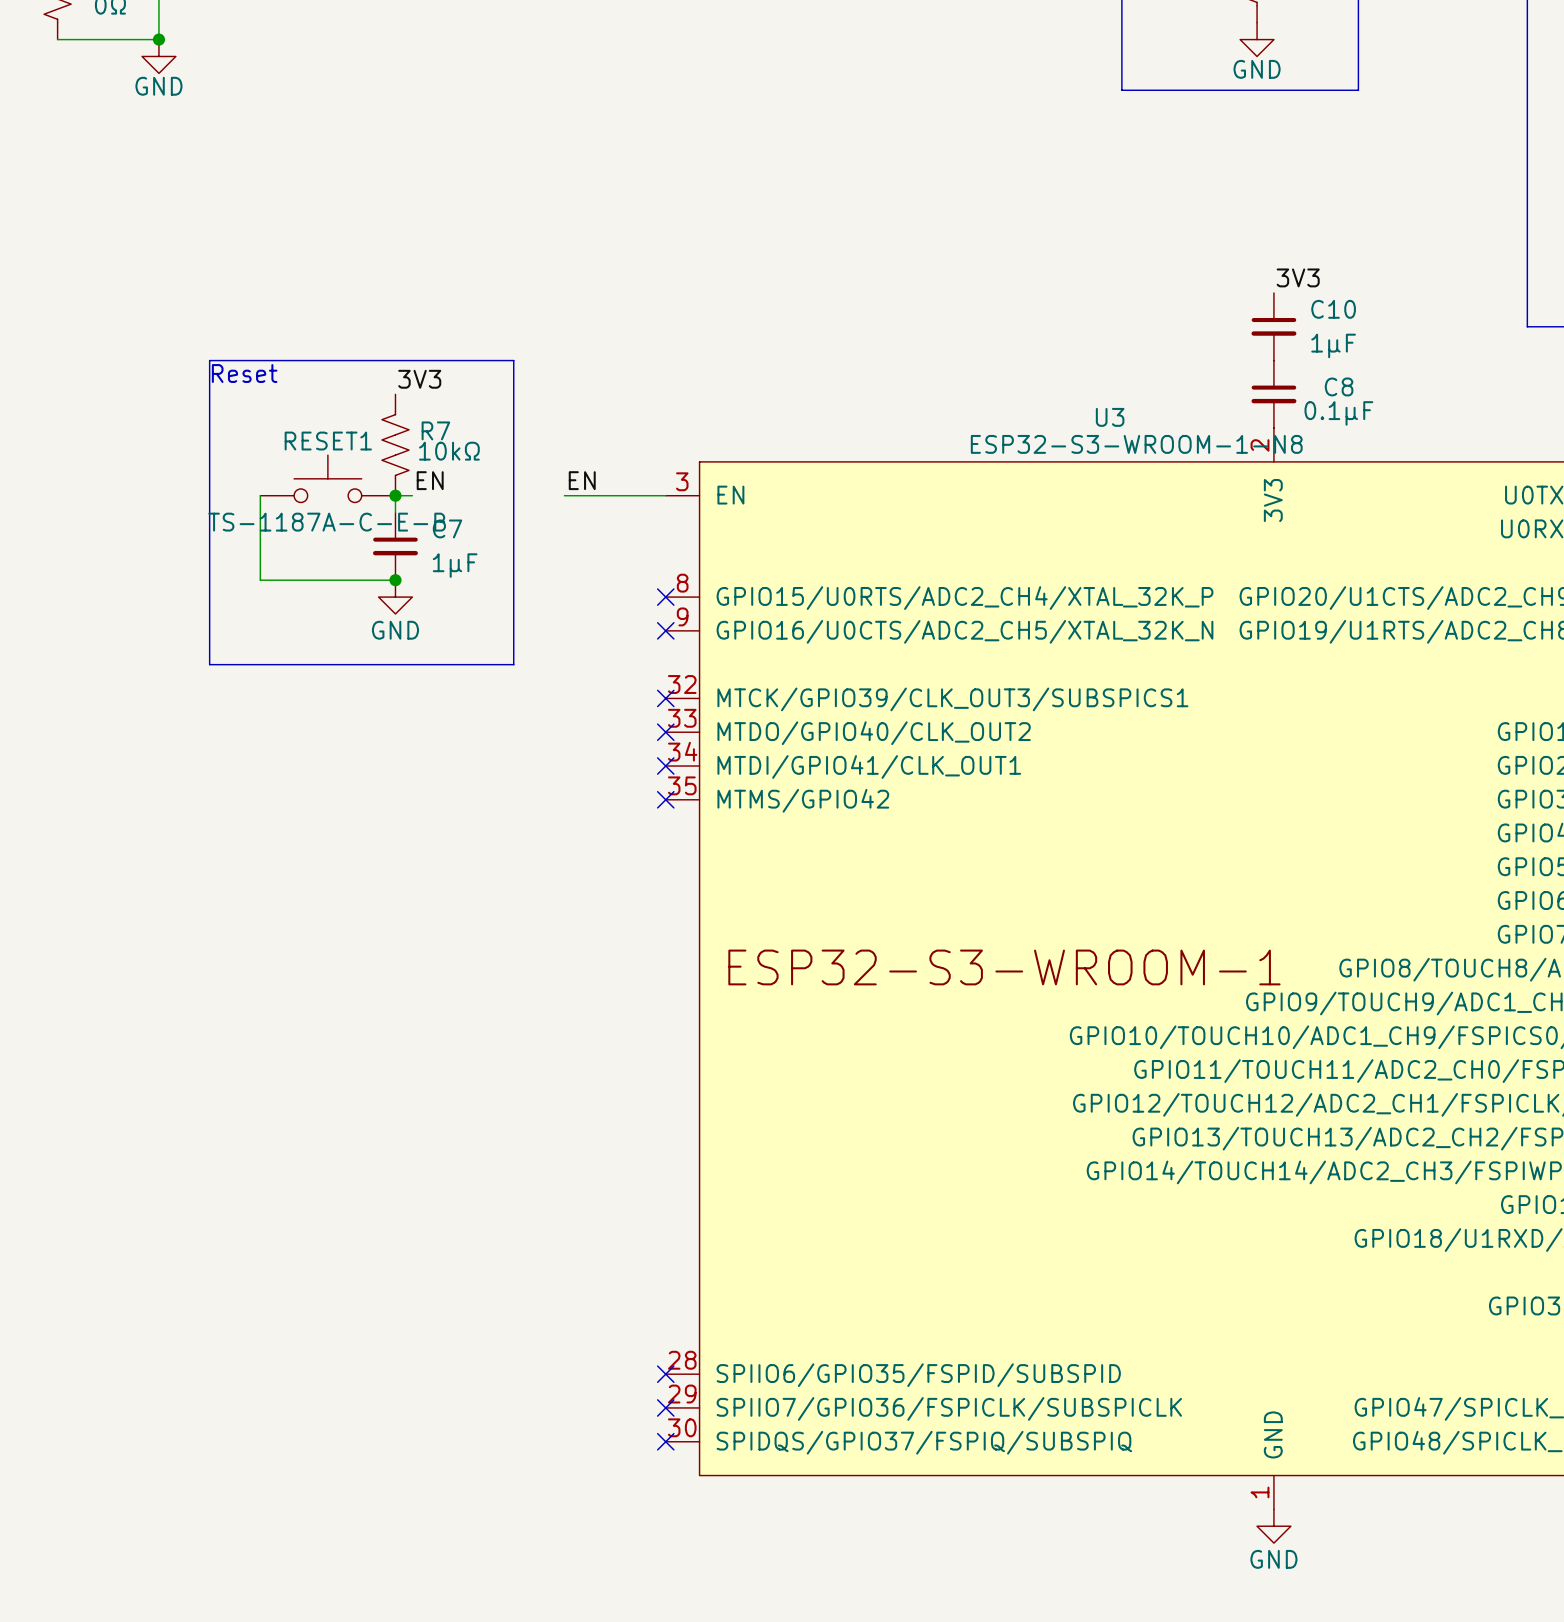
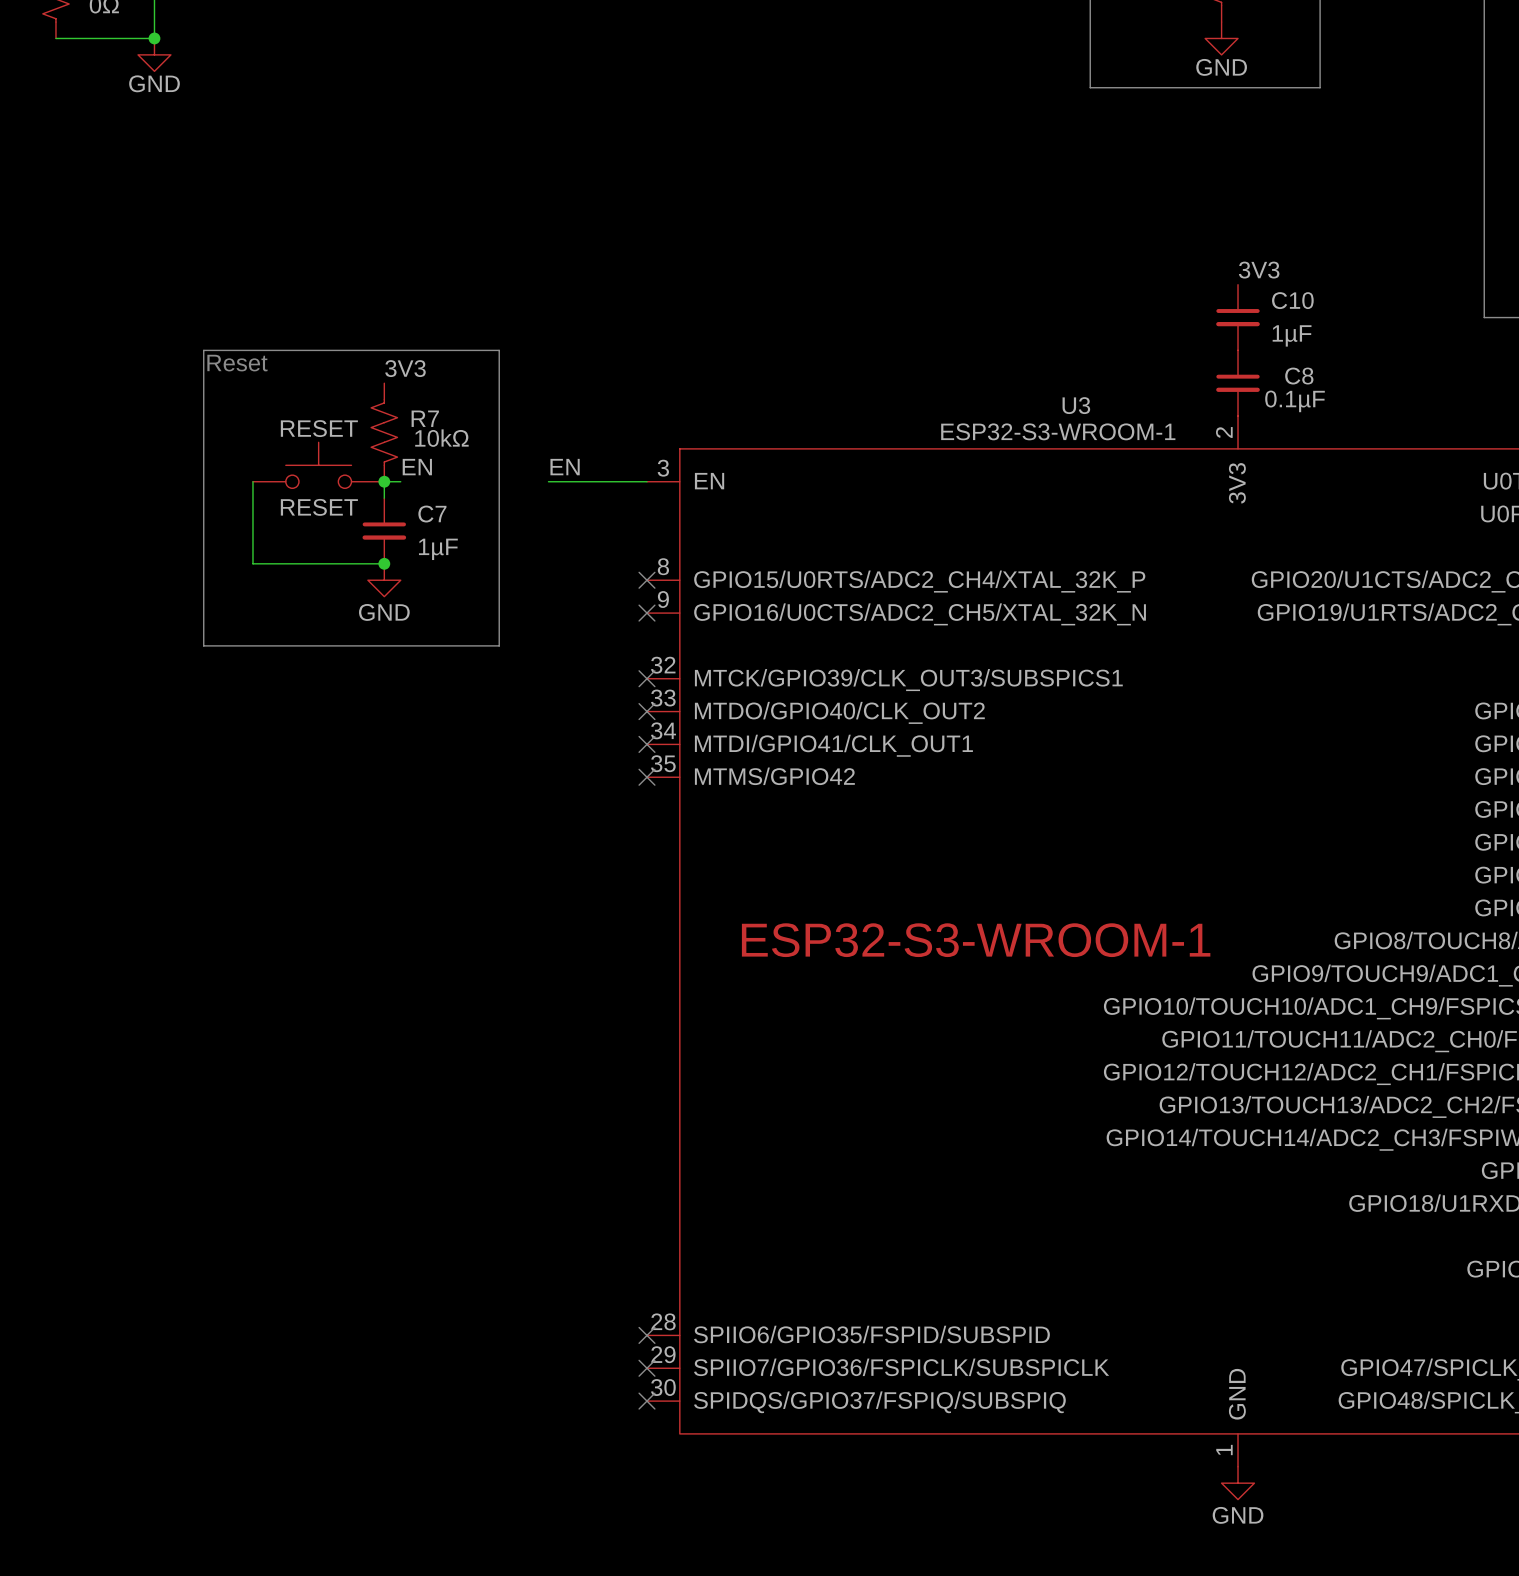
RESET1 name: RESET1 (328, 441) -> RESET (319, 428)
U3 value: ESP32-S3-WROOM-1-N8 (1136, 444) -> ESP32-S3-WROOM-1 (1058, 431)
RESET1 value: TS-1187A-C-E-B (327, 522) -> RESET (319, 507)

